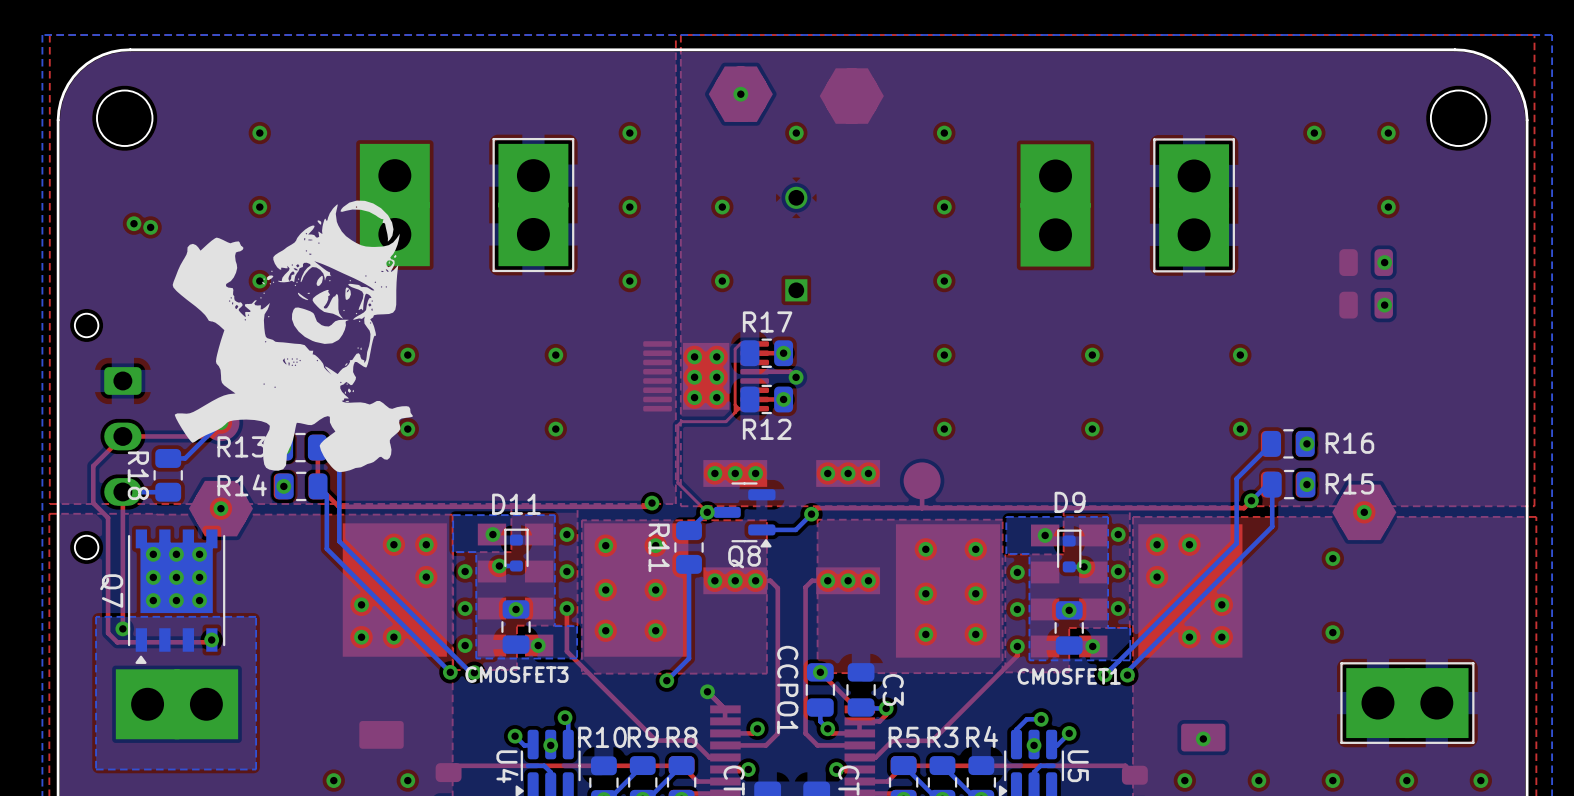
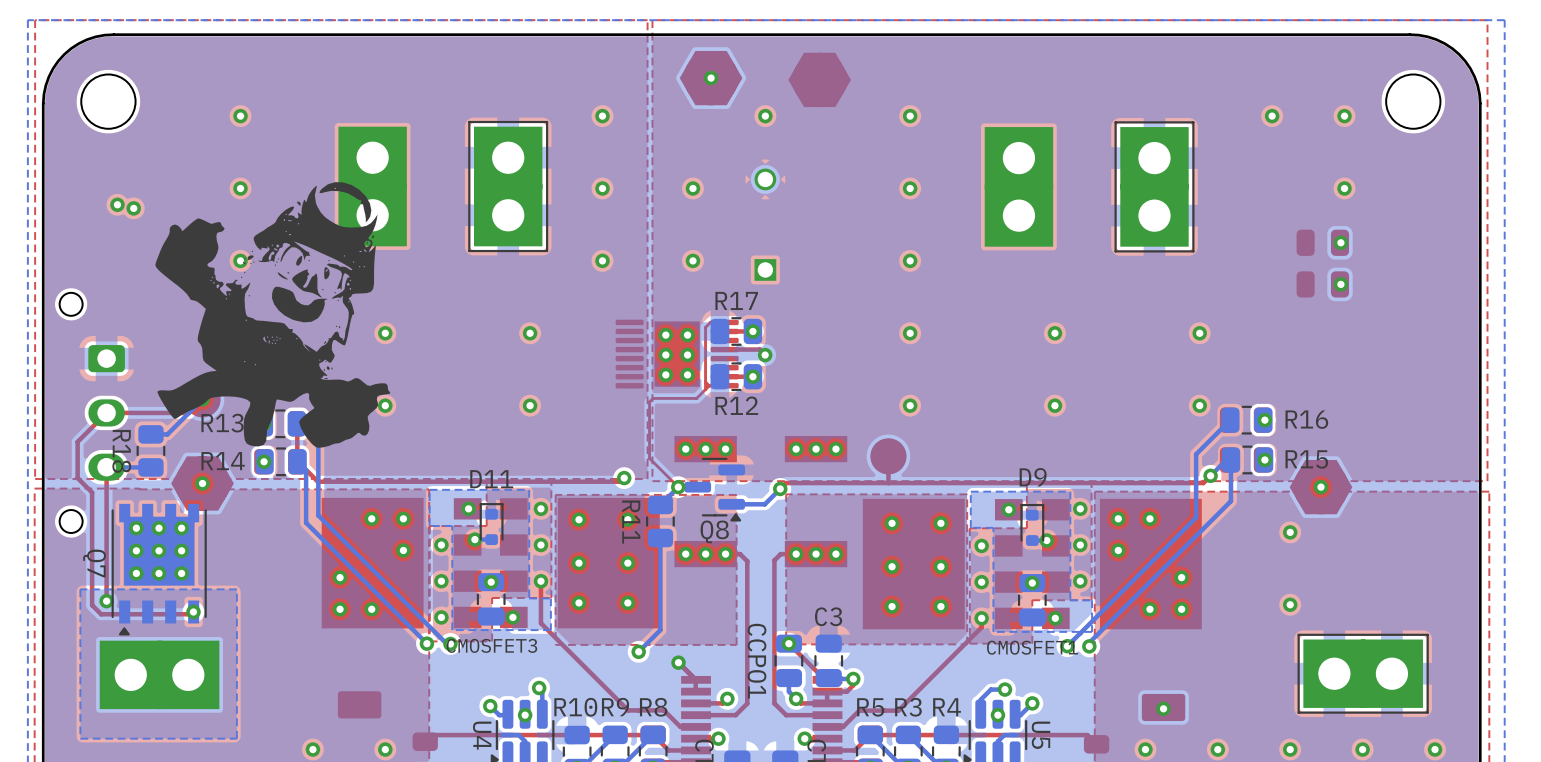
C3 name rotation: 0° (893, 689) -> 90° counterclockwise (828, 616)
C3 name position: C3 (893, 689) -> C3 (828, 616)

